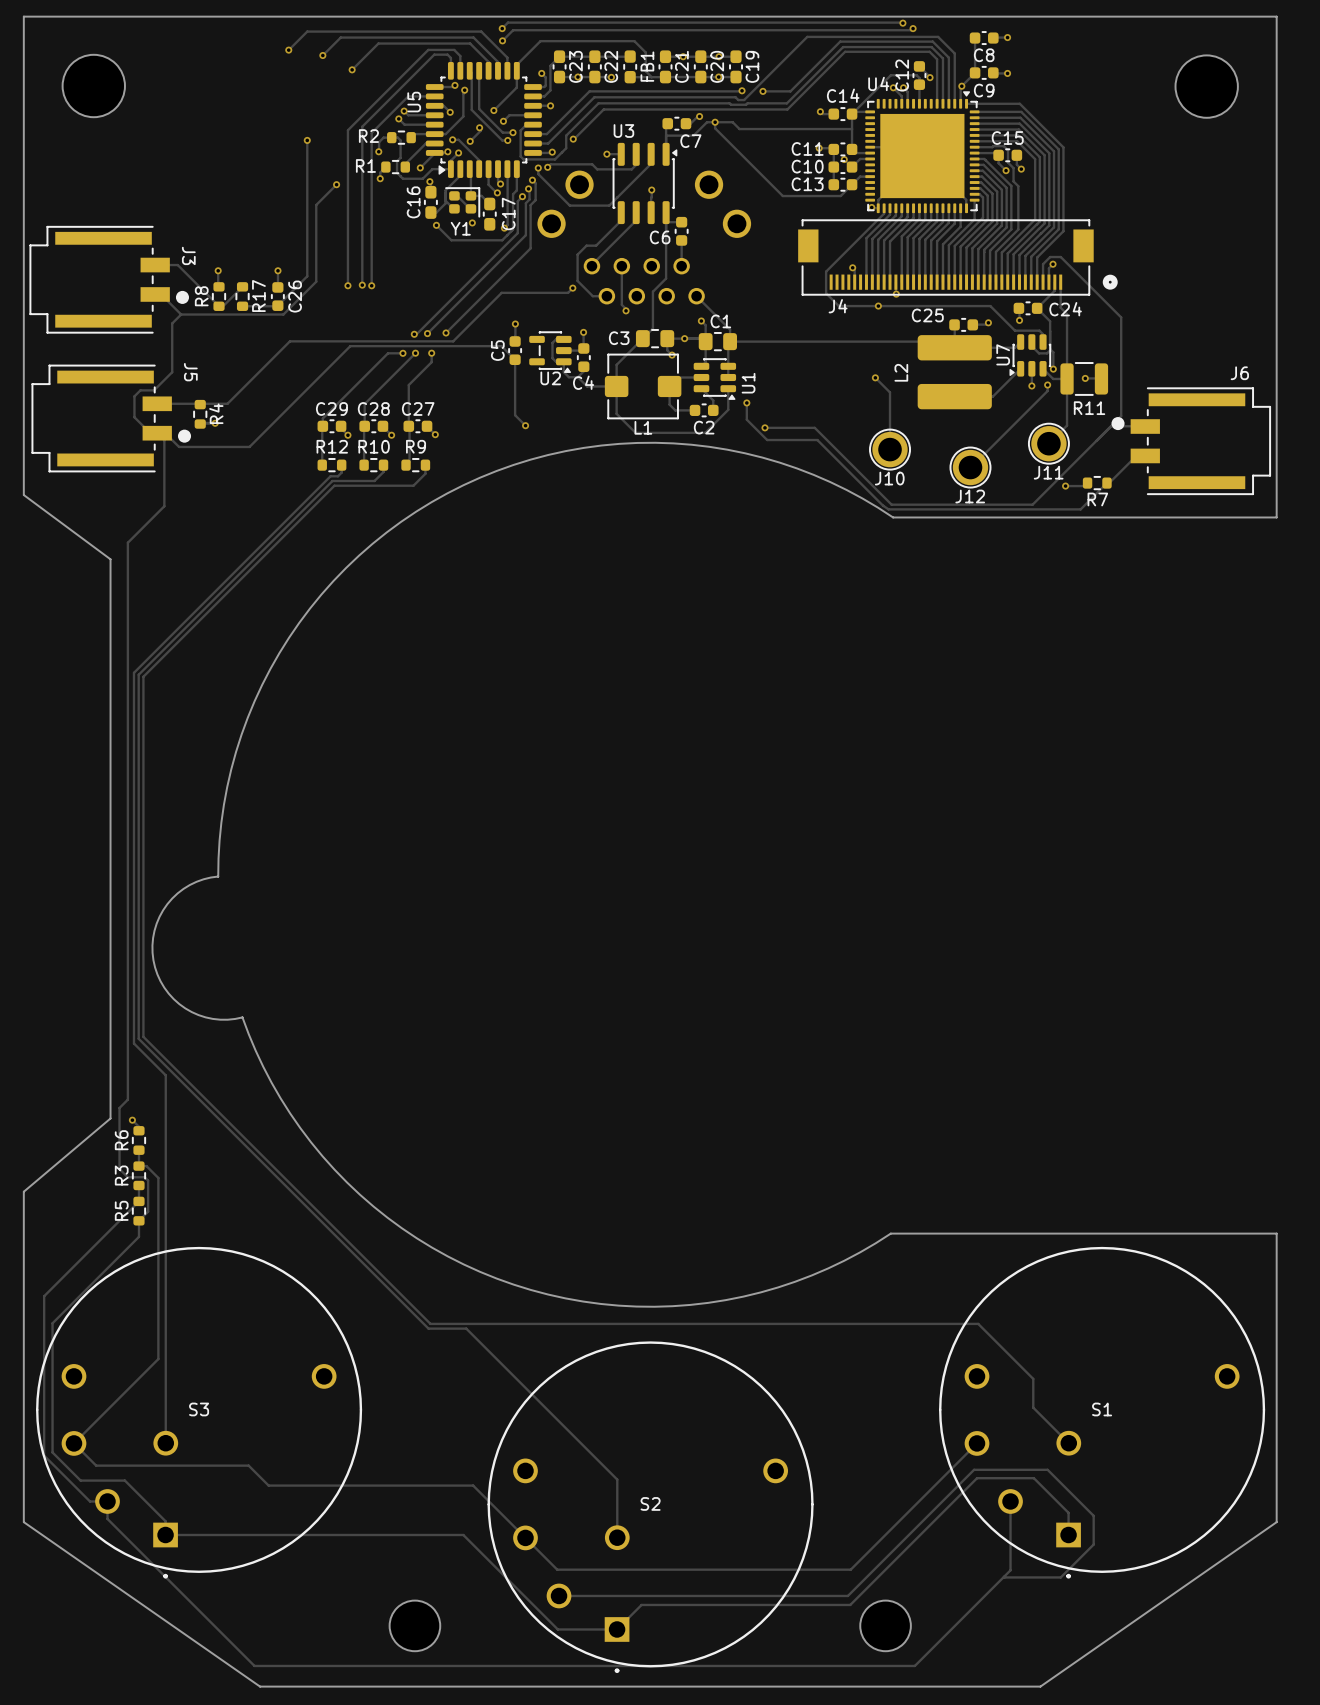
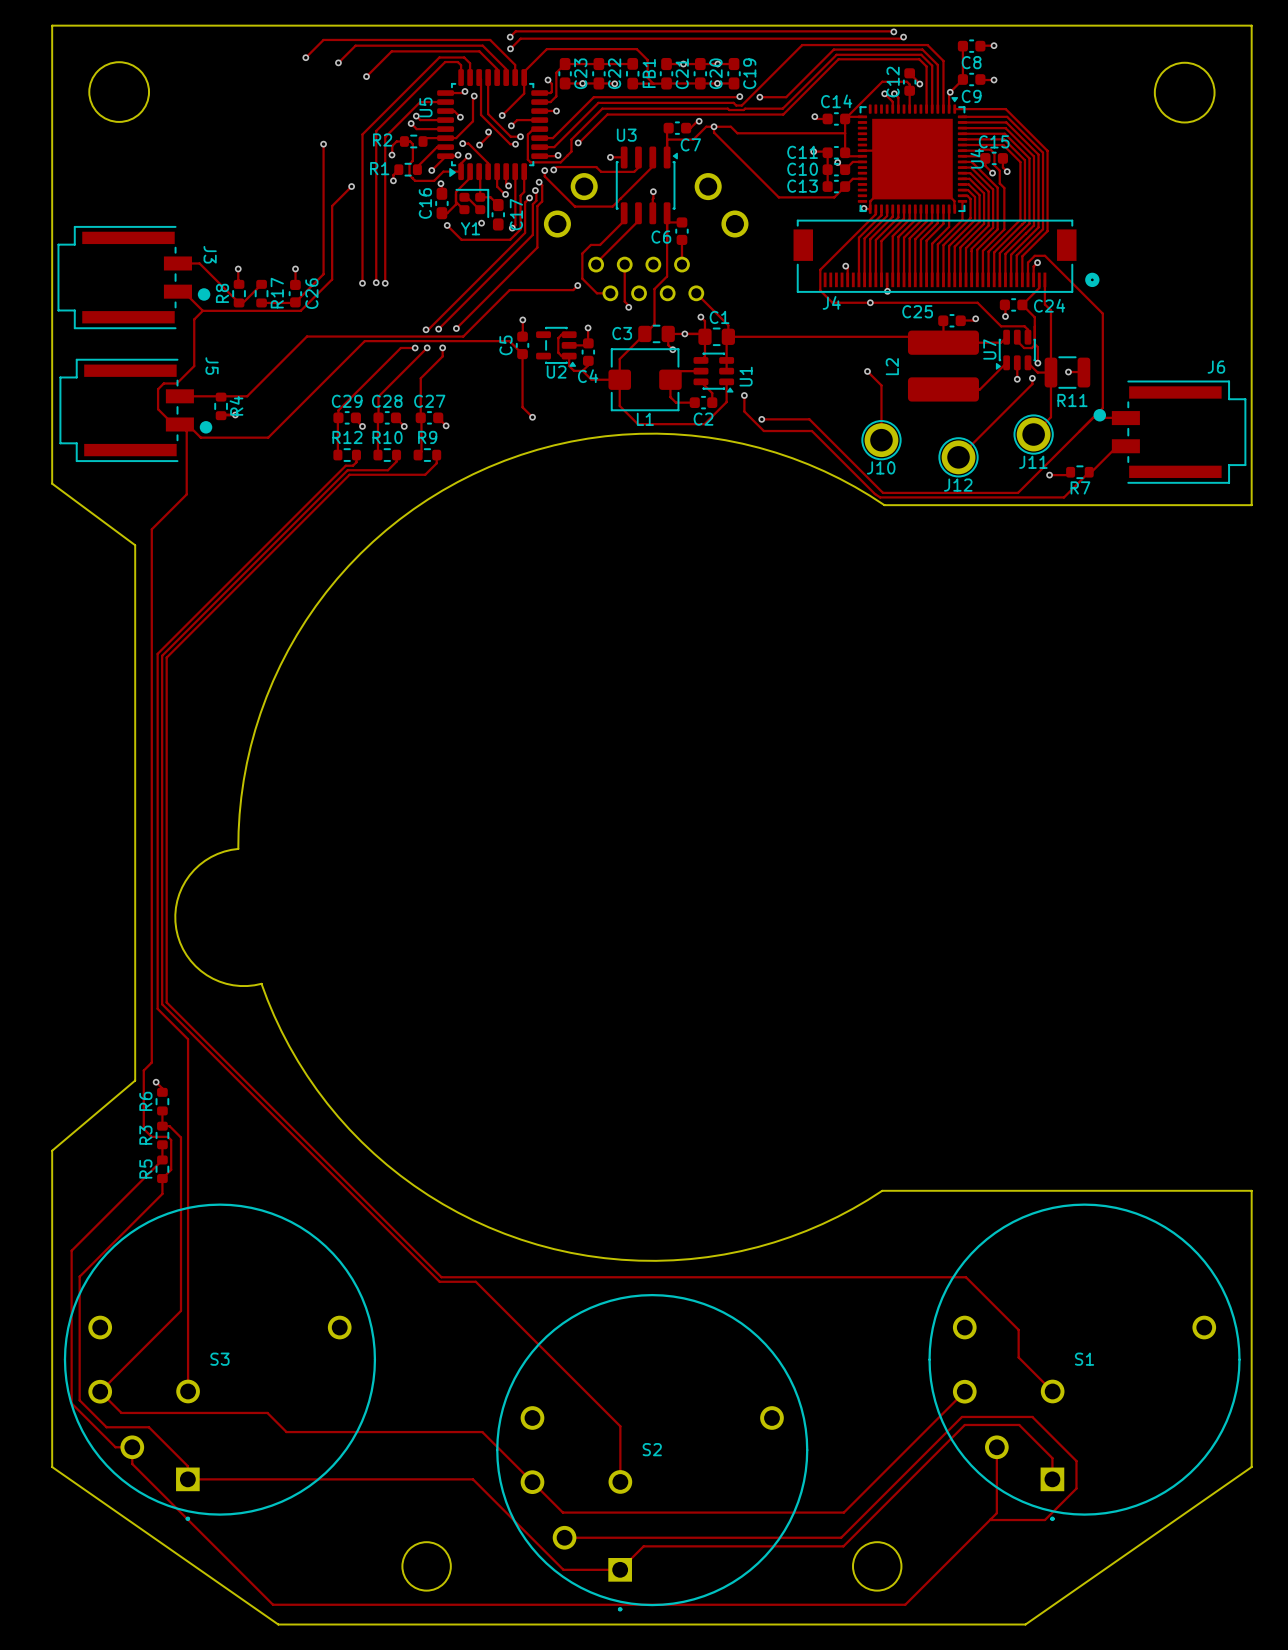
U4 name rotation: 0° (878, 83) -> 90° counterclockwise (977, 158)
U4 name position: U4 (878, 83) -> U4 (977, 158)

